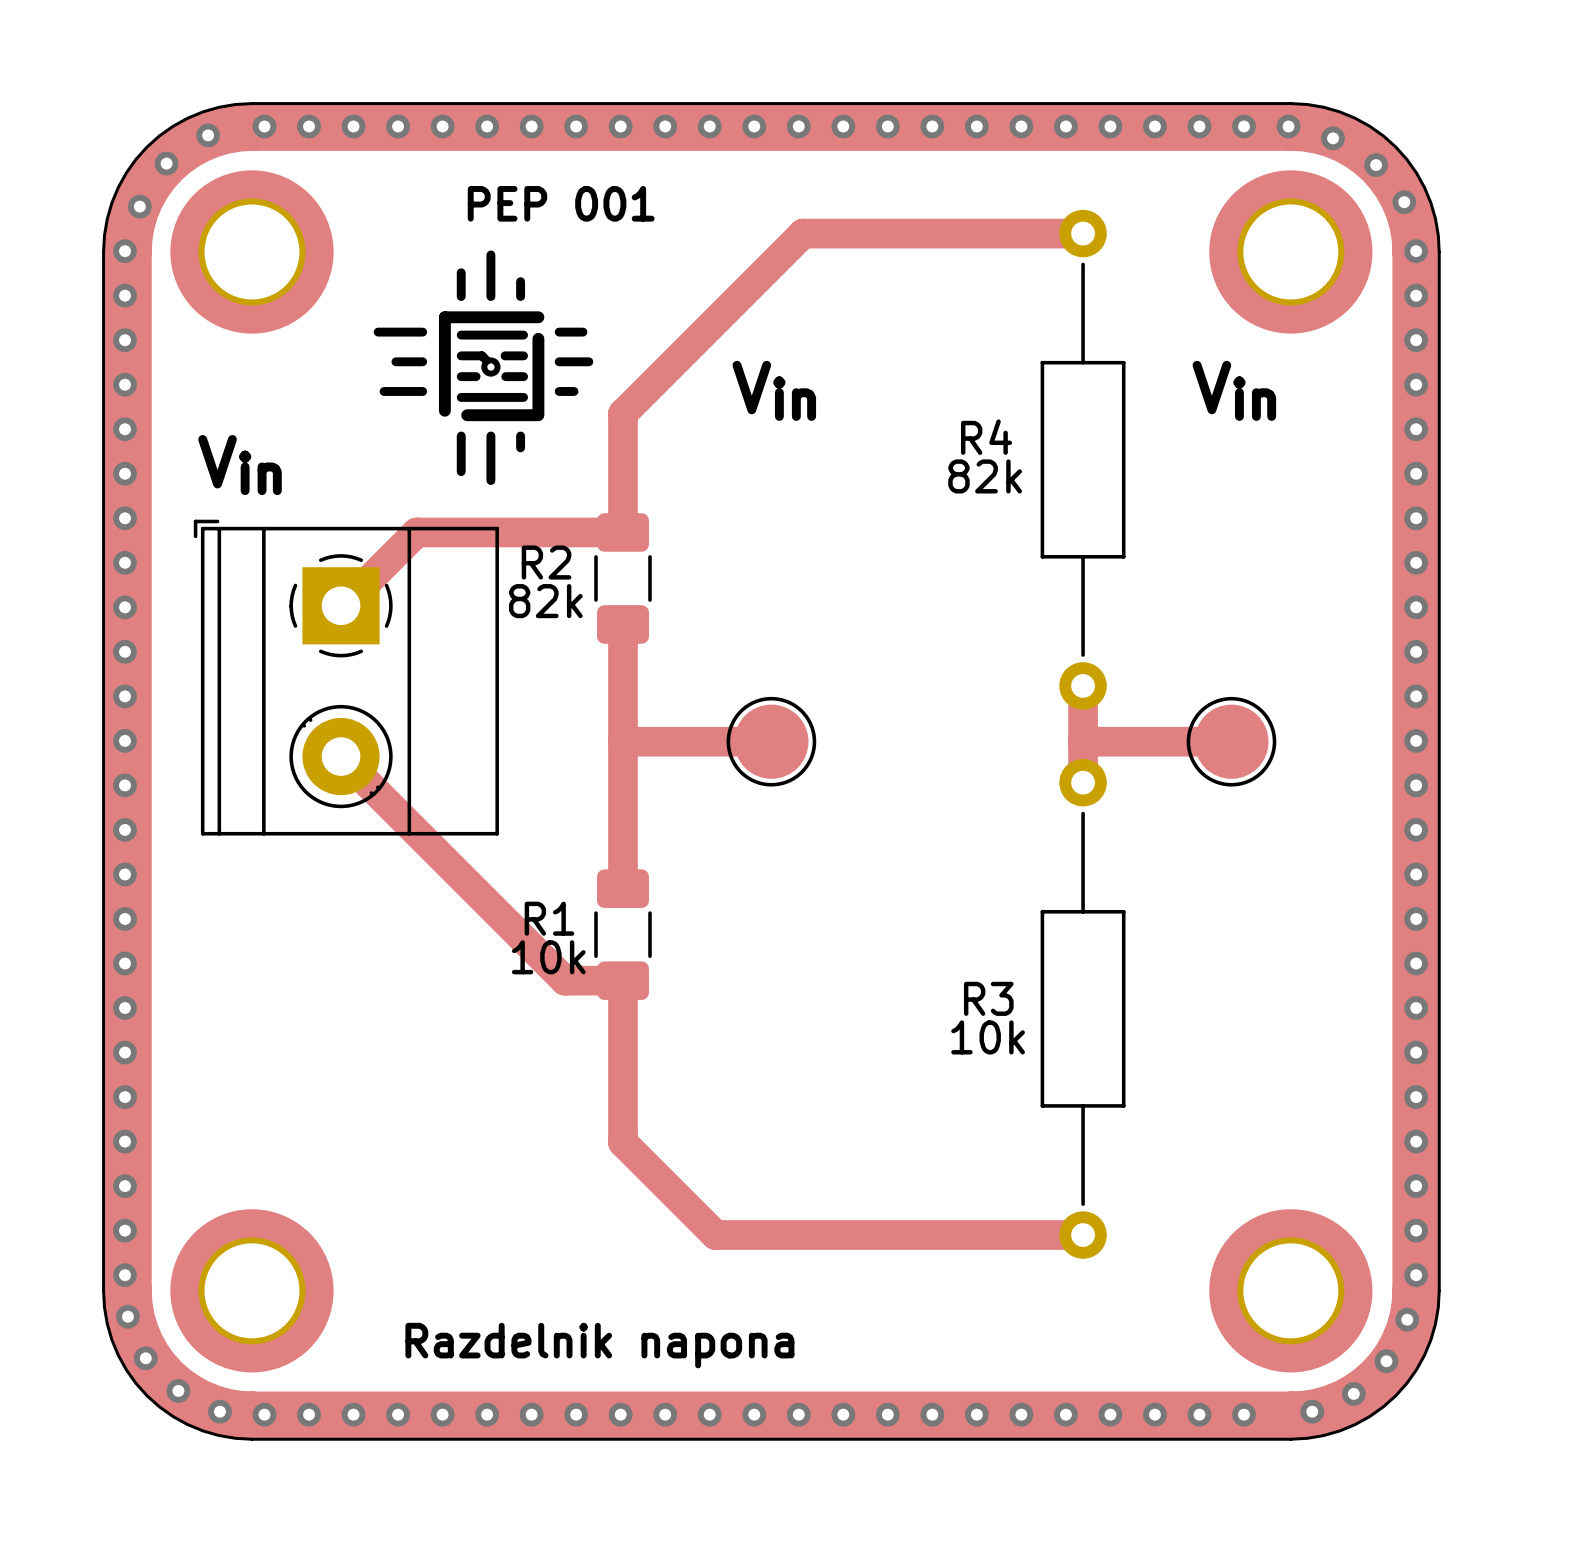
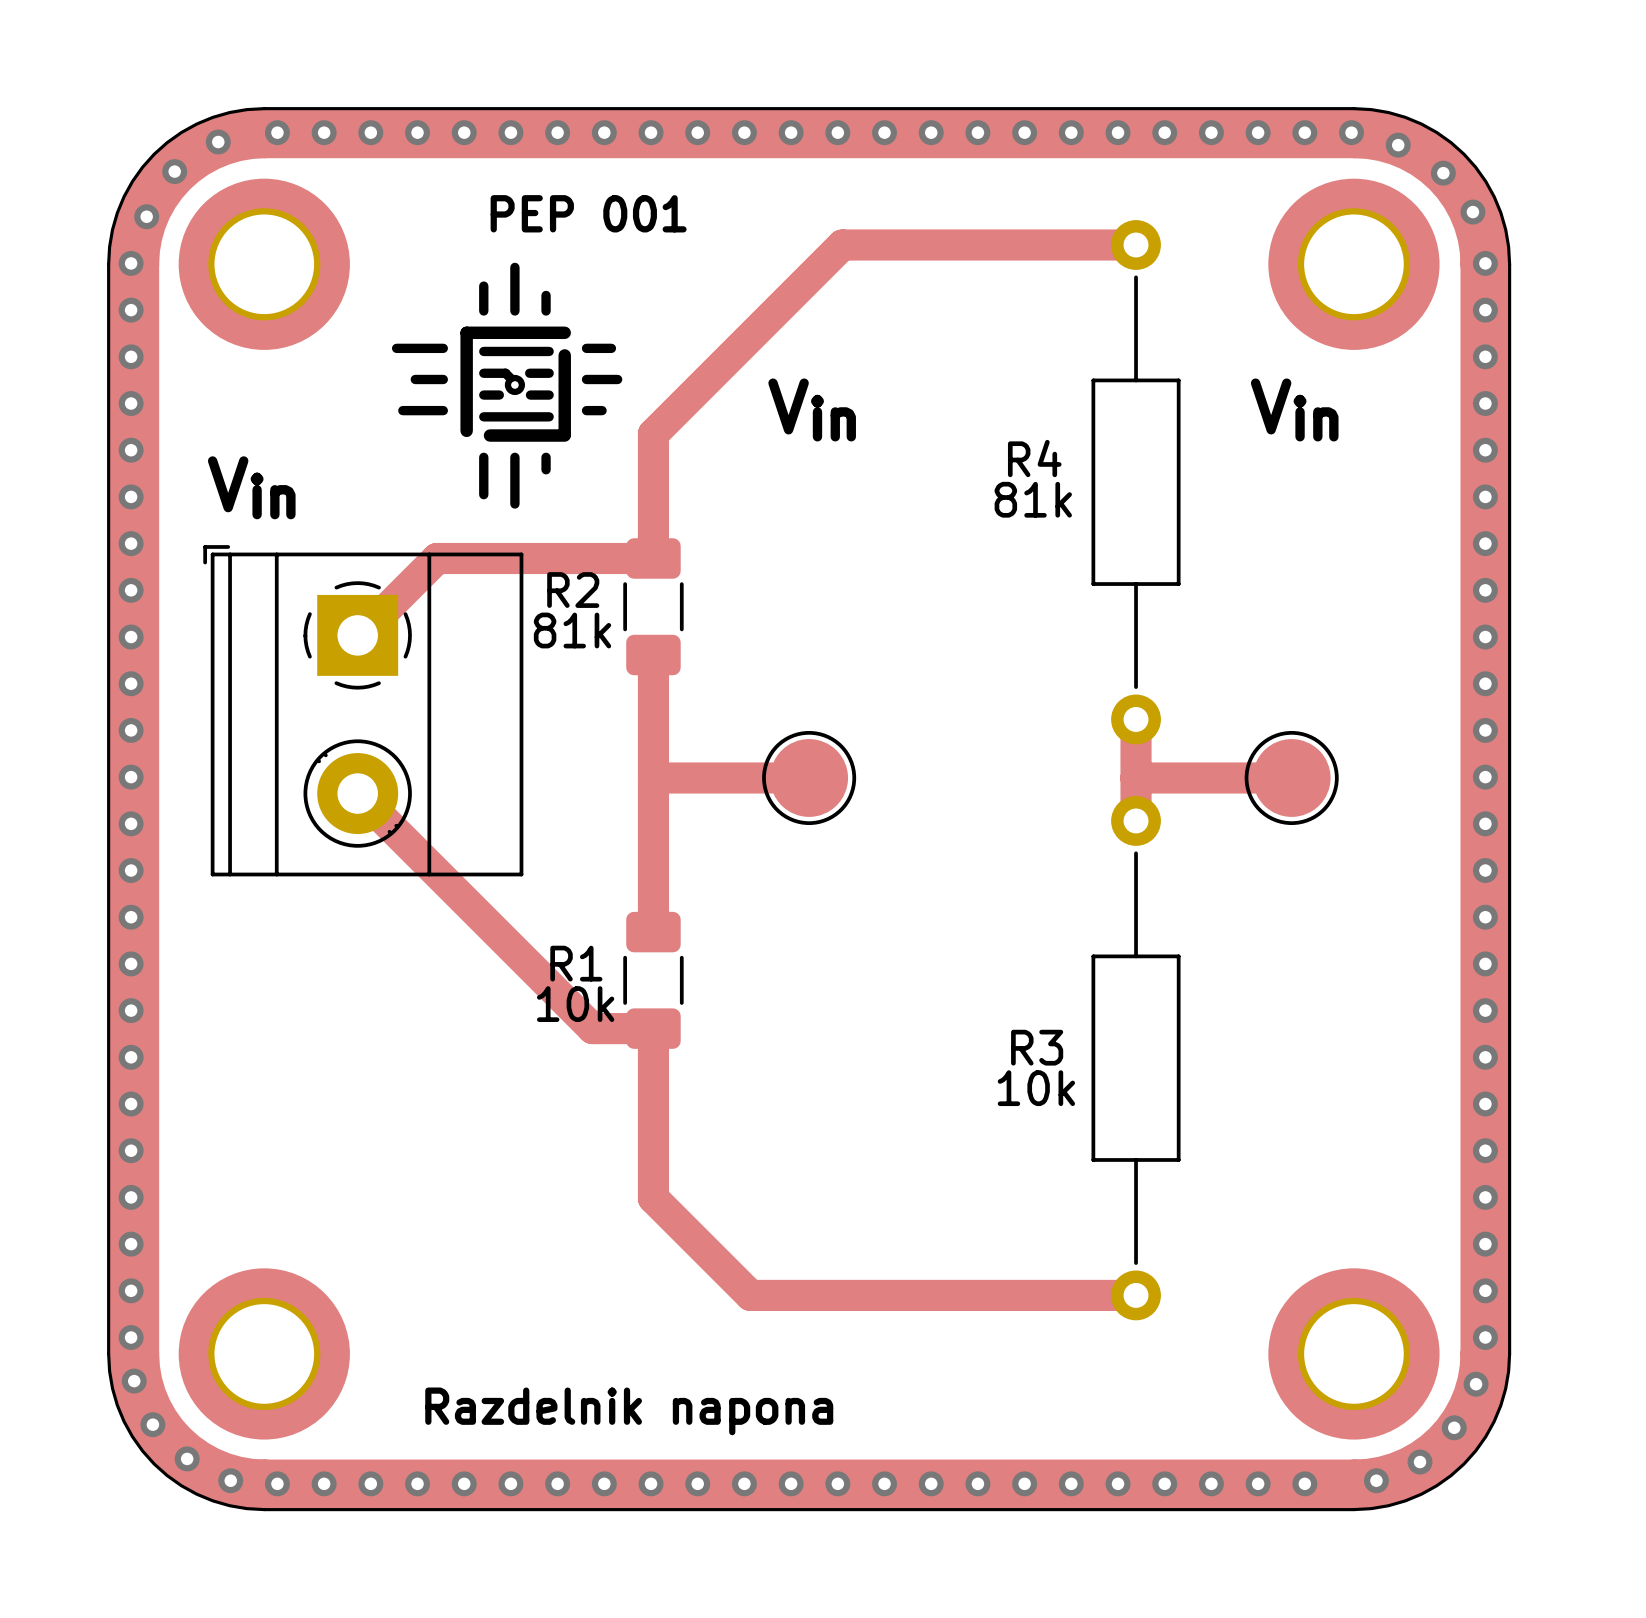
R4 value: 82k (985, 476) -> 81k (1033, 499)
R2 value: 82k (545, 601) -> 81k (572, 630)

